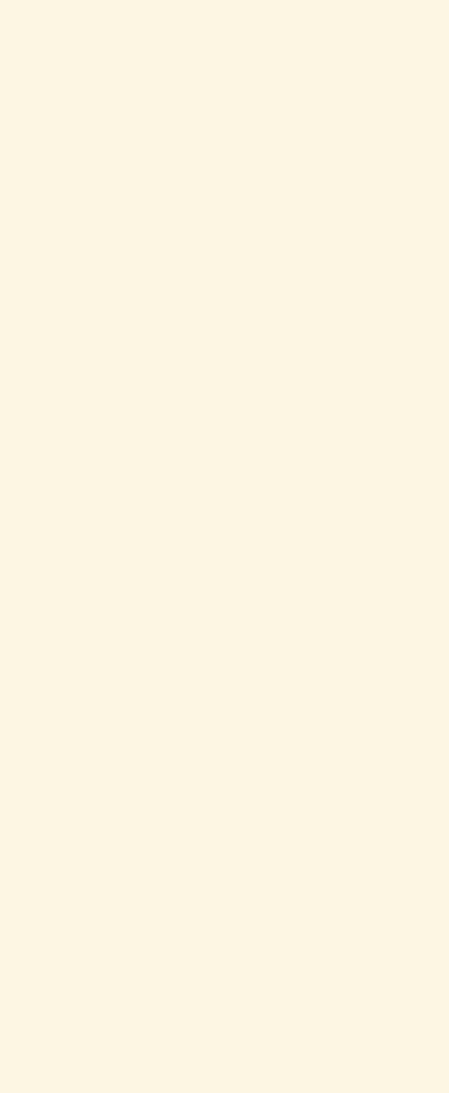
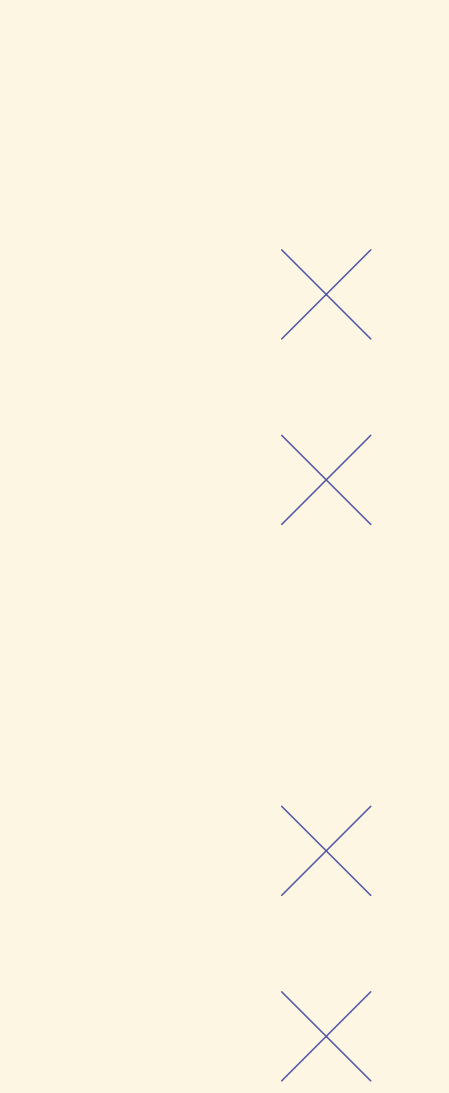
no-connect mark: none -> (326, 294)
no-connect mark: none -> (326, 479)
no-connect mark: none -> (326, 850)
no-connect mark: none -> (326, 1036)

